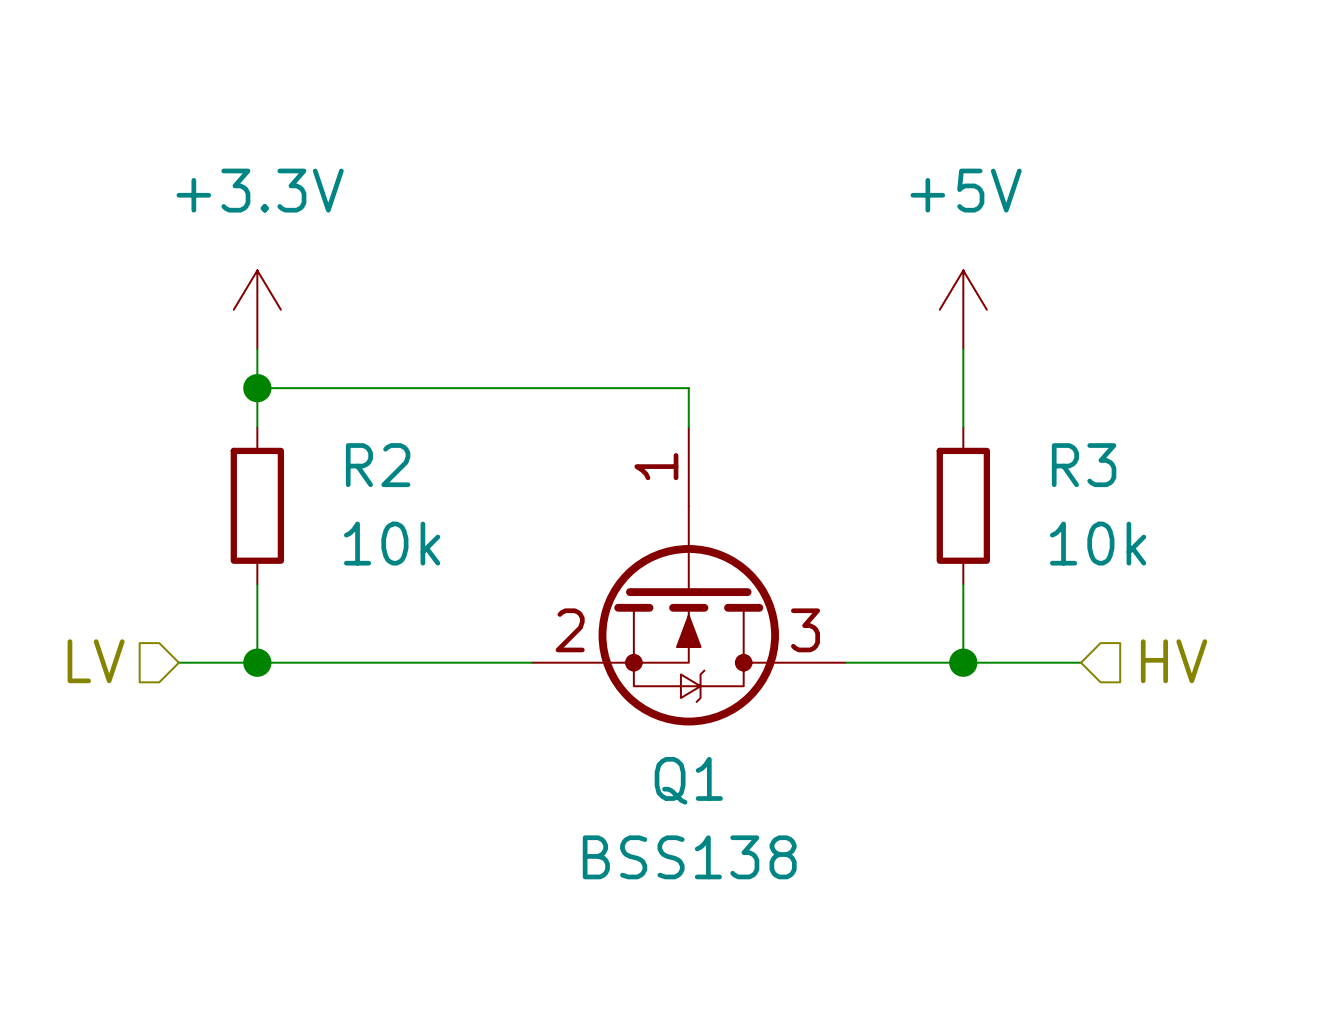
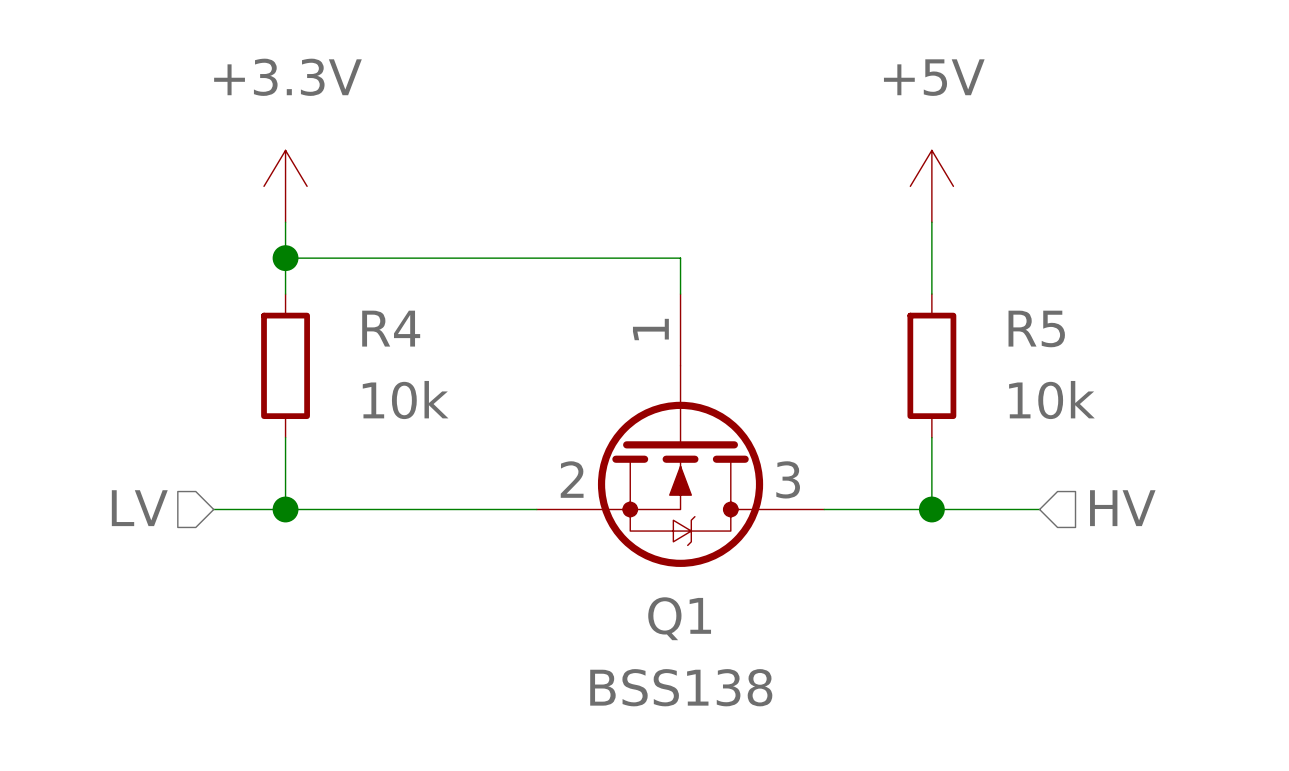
R2 name: R2 (378, 465) -> R4 (391, 328)
R3 name: R3 (1084, 465) -> R5 (1036, 328)

